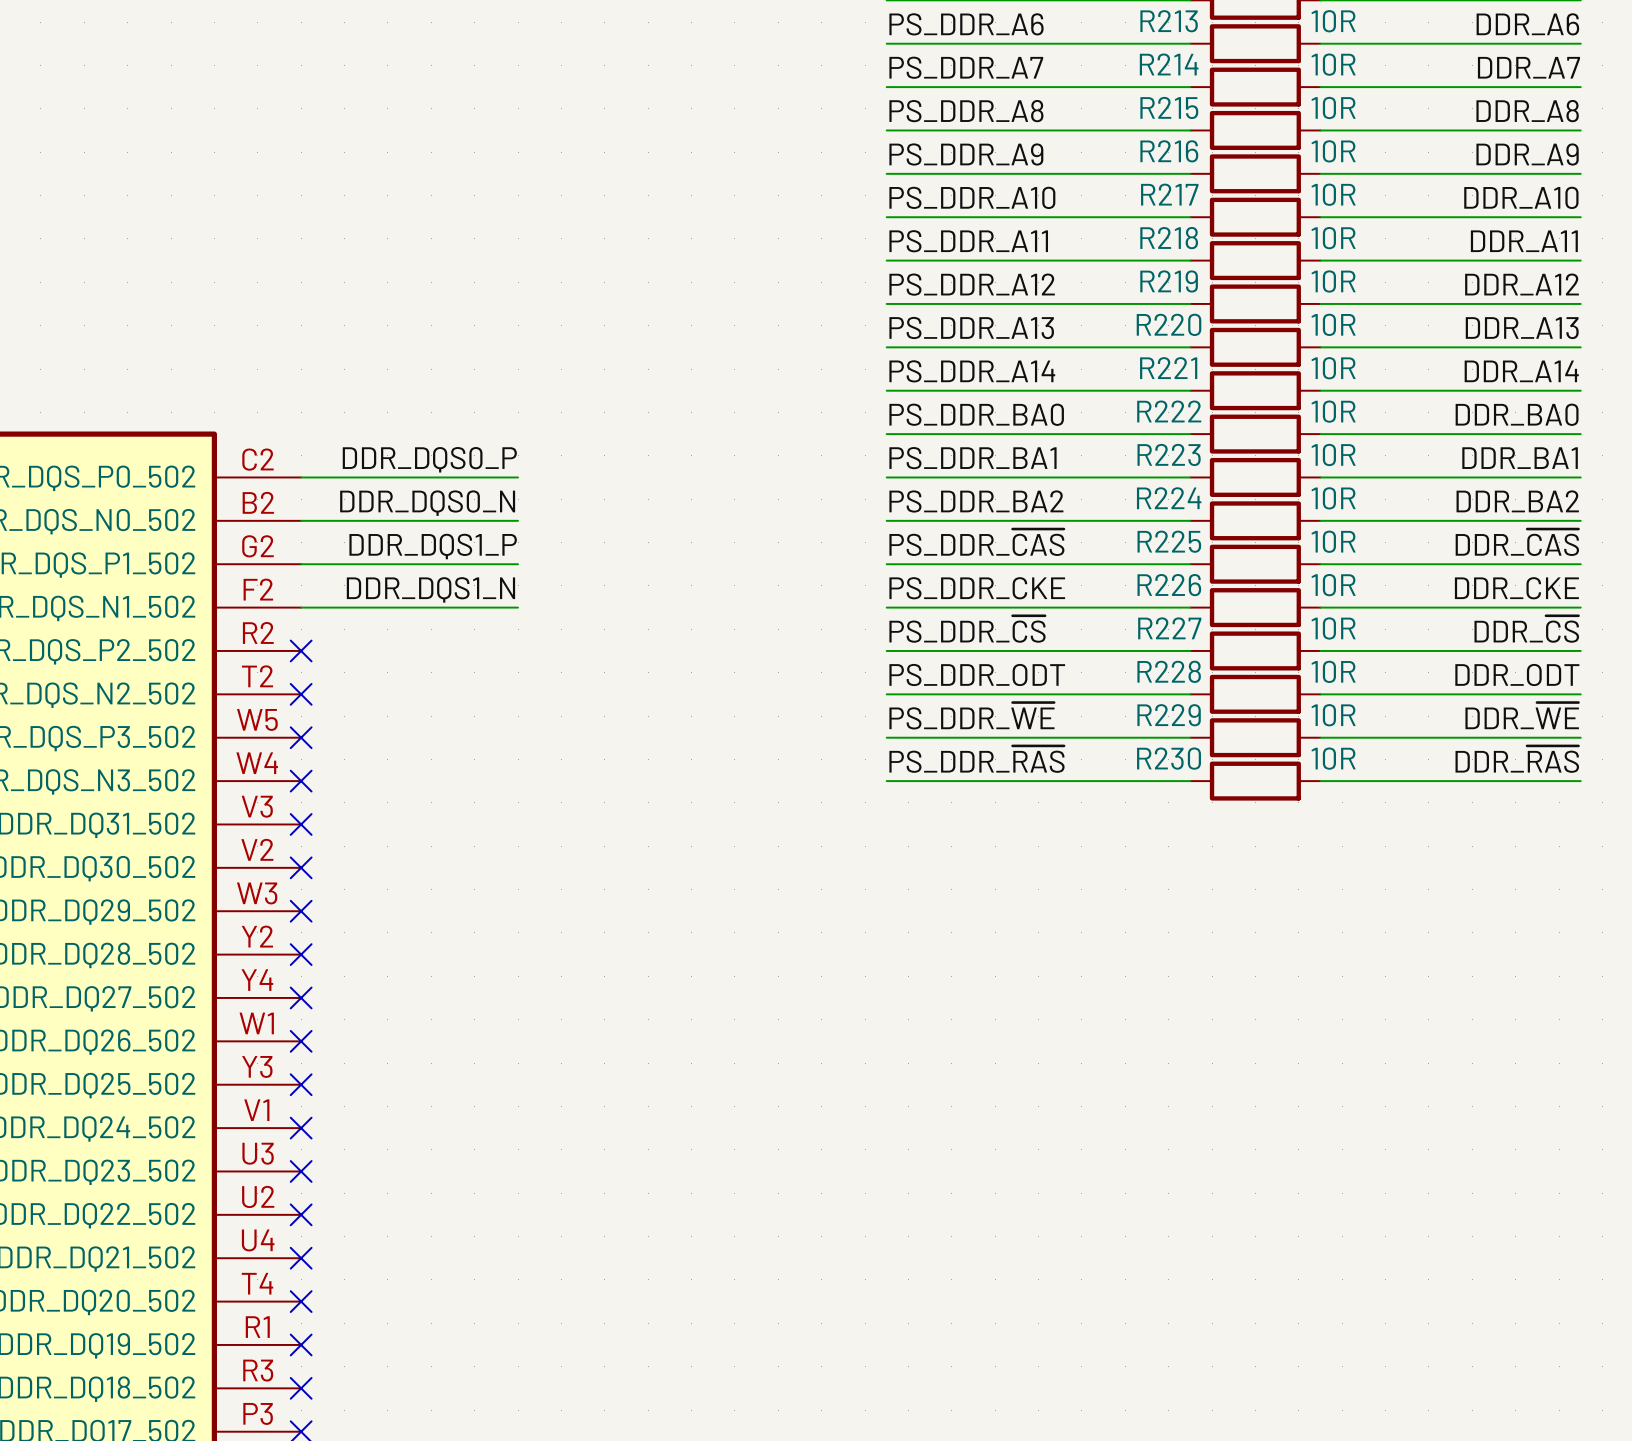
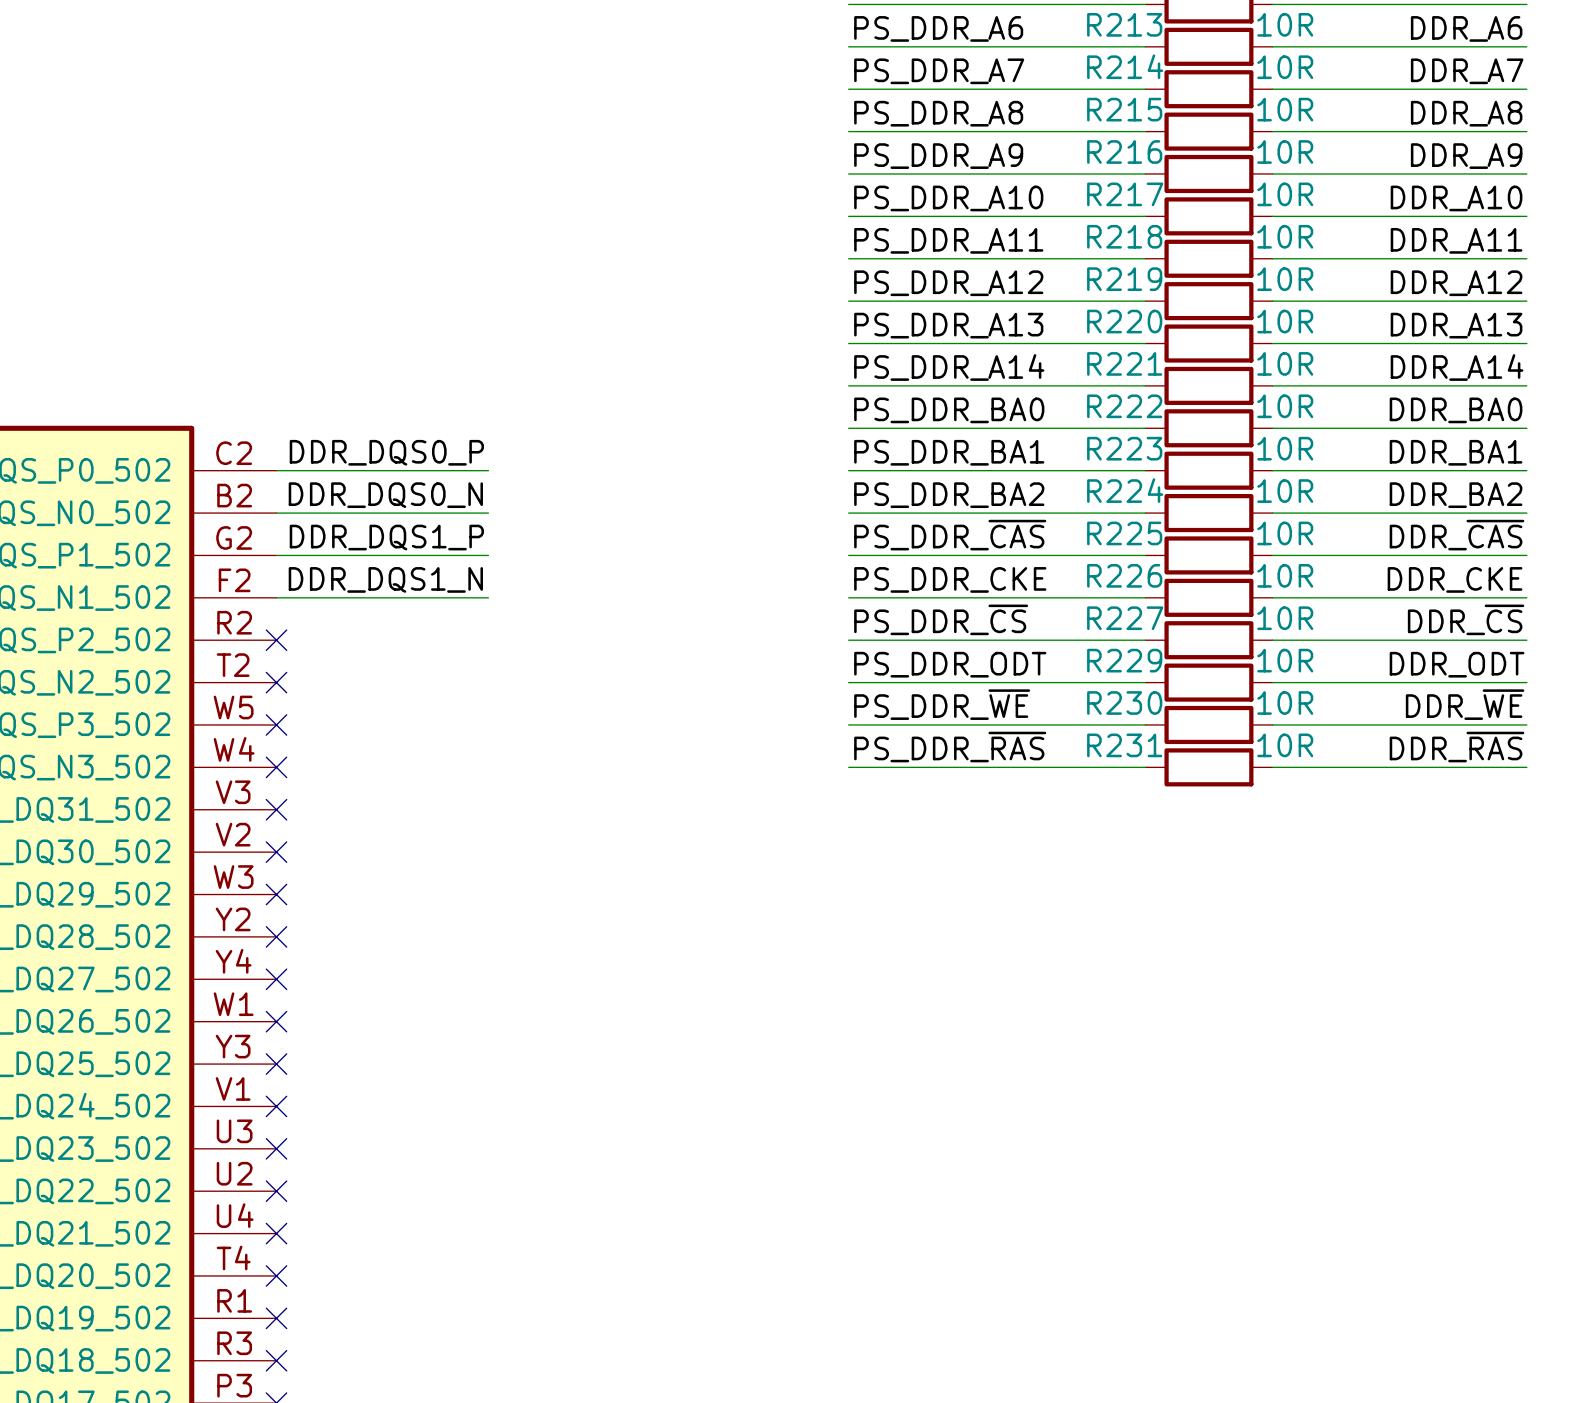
R228 name: R228 (1169, 671) -> R229 (1124, 660)
R229 name: R229 (1169, 715) -> R230 (1124, 703)
R230 name: R230 (1169, 758) -> R231 (1124, 745)

